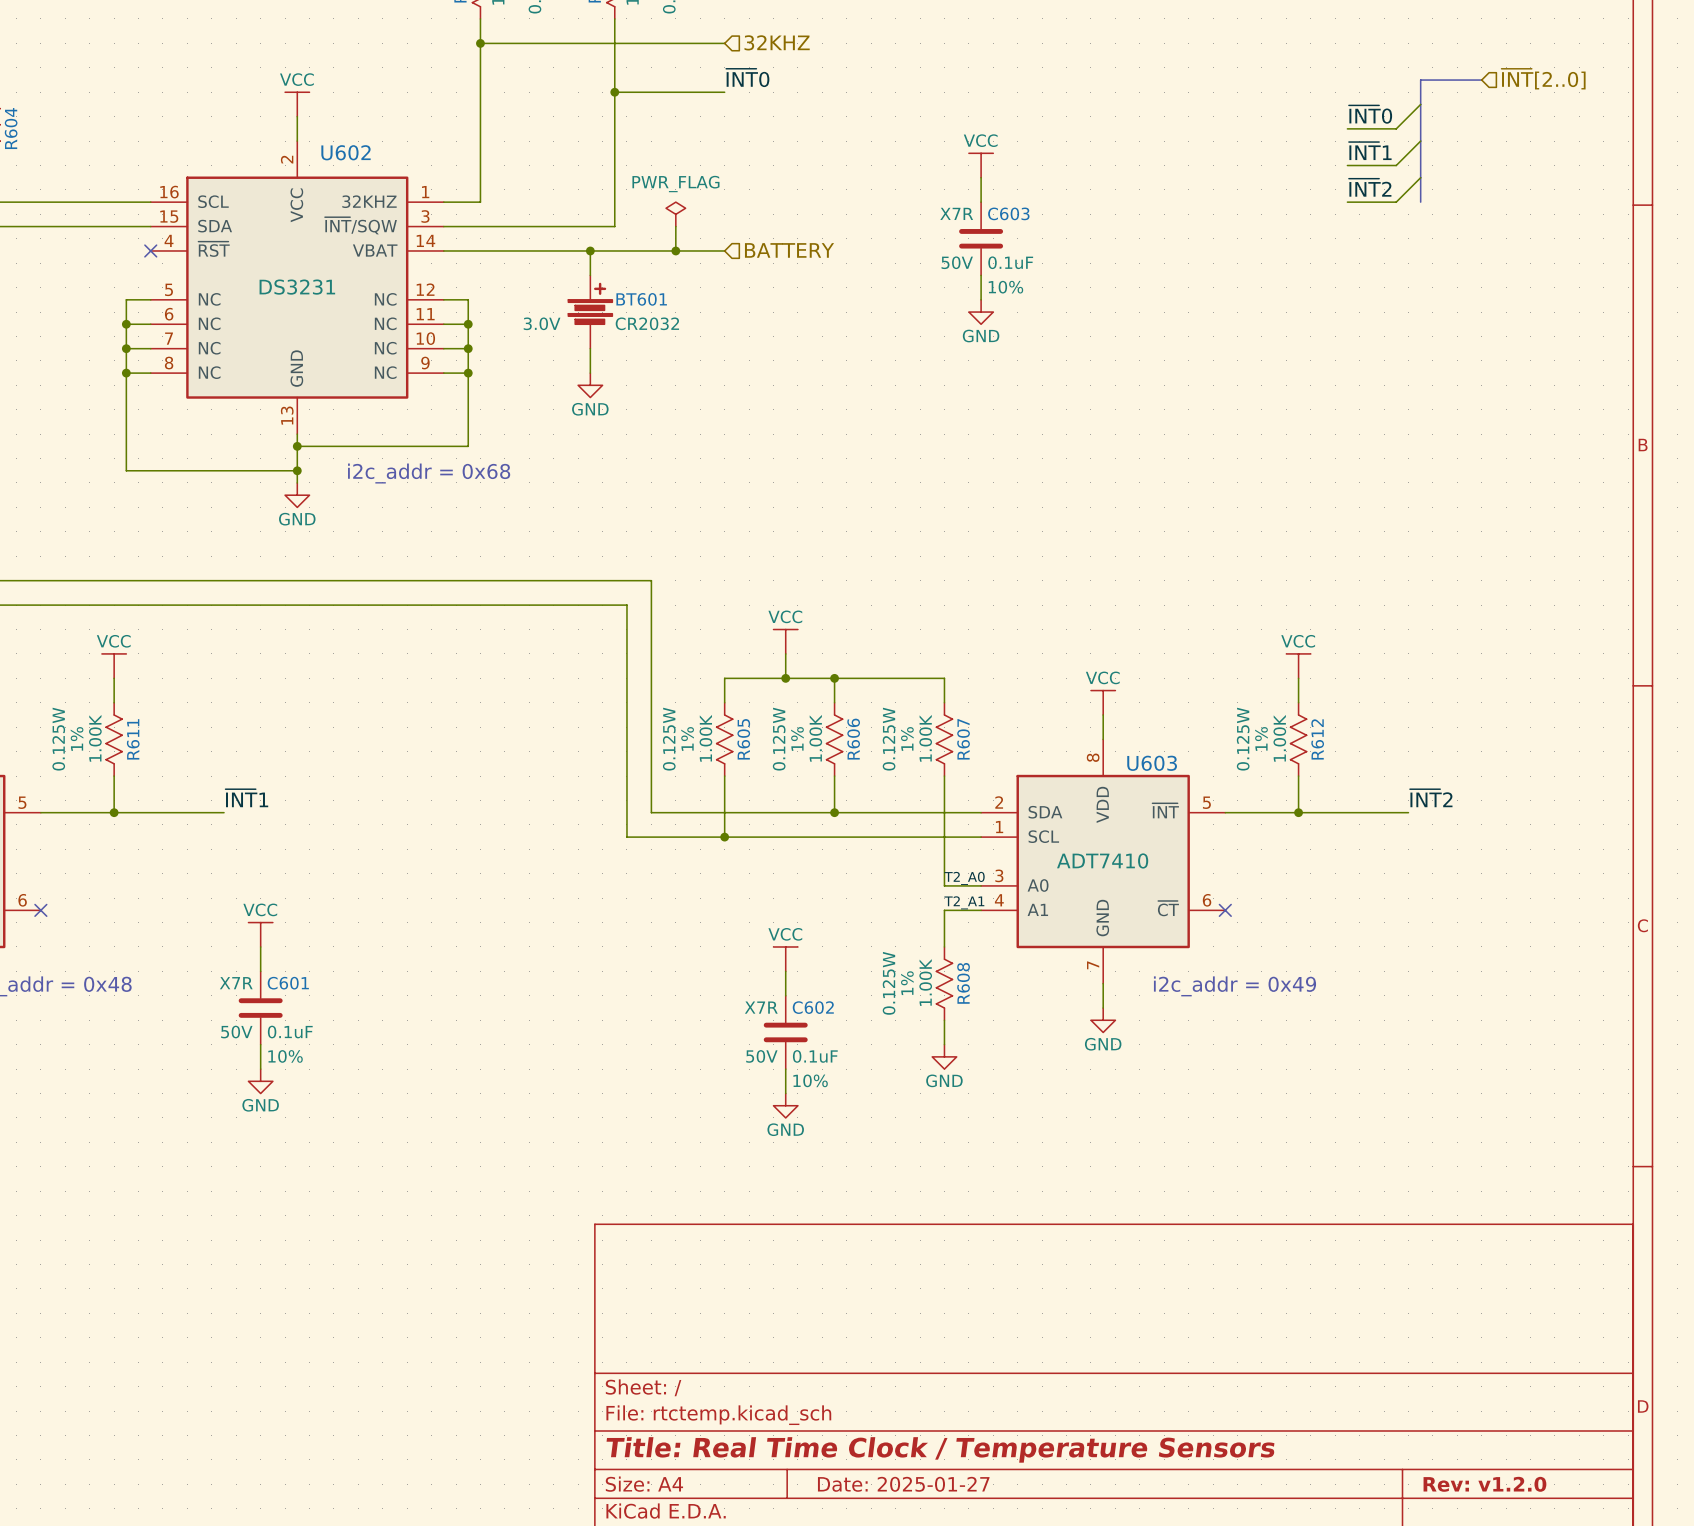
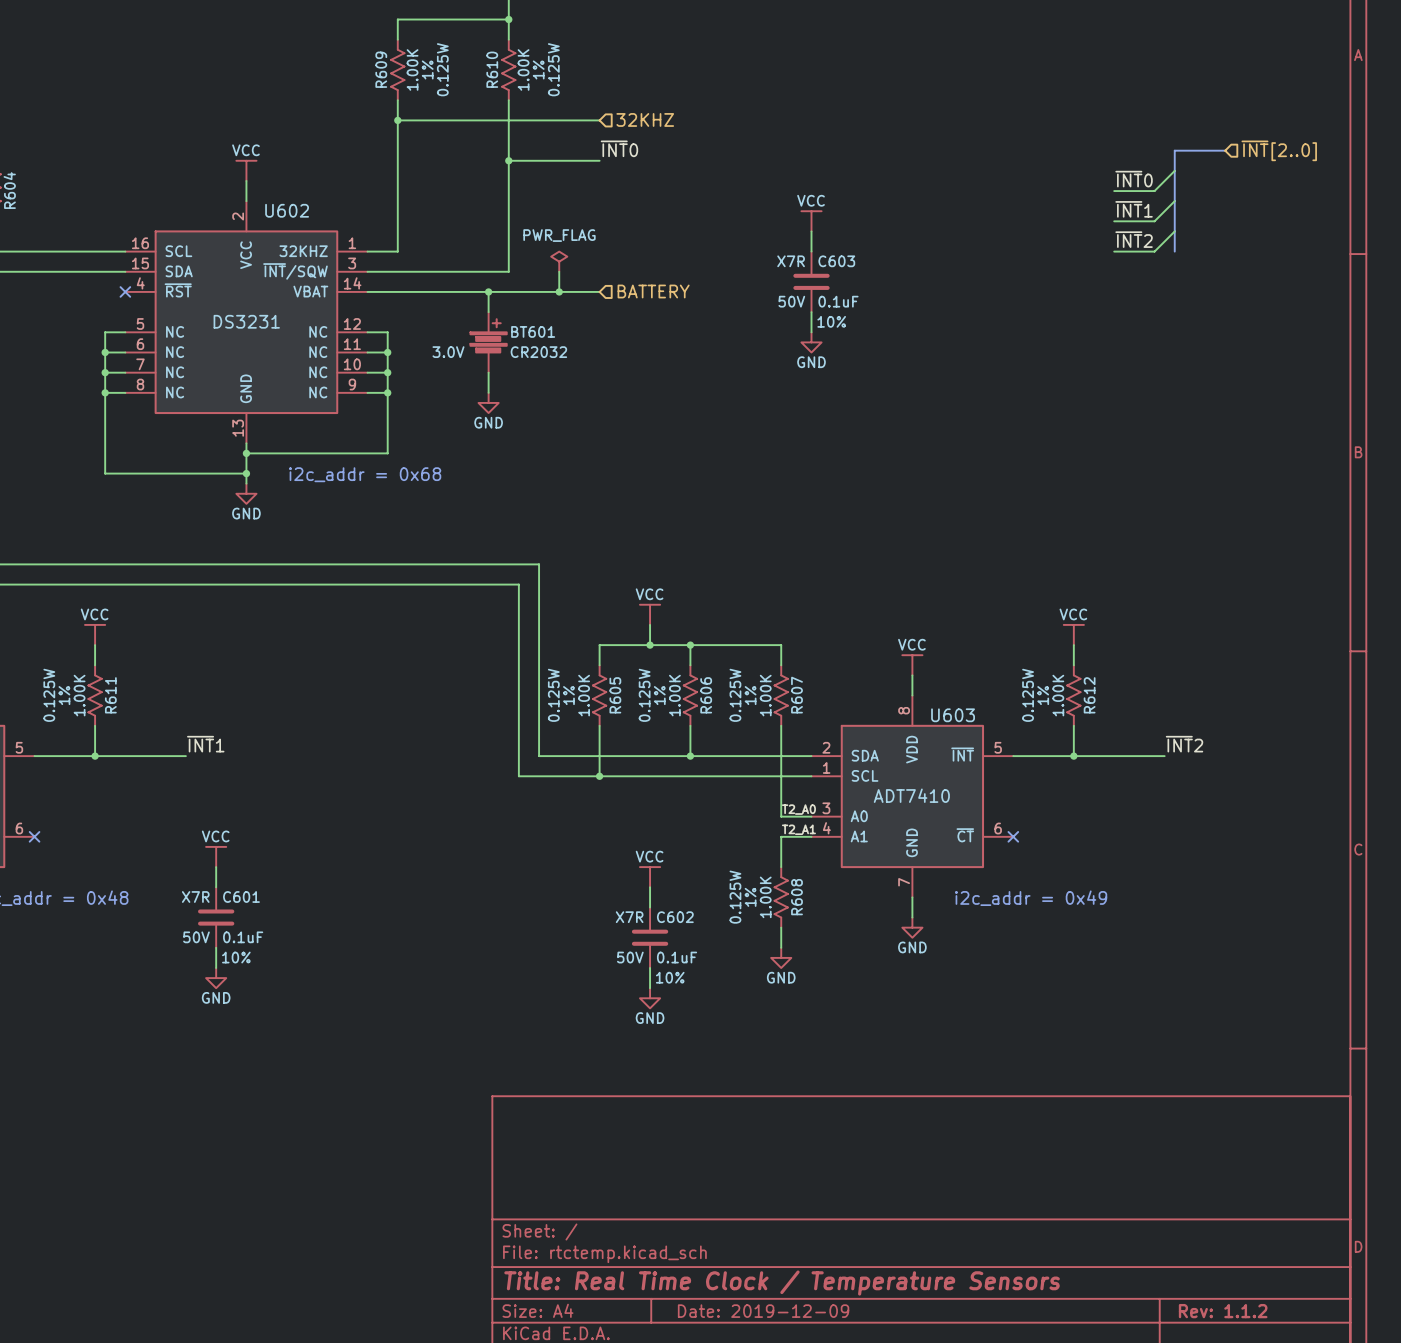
title block: Date: 2025-01-27 (903, 1484) -> Date: 2019-12-09 (763, 1311)
title block: Rev: v1.2.0 (1484, 1484) -> Rev: 1.1.2 (1223, 1311)

